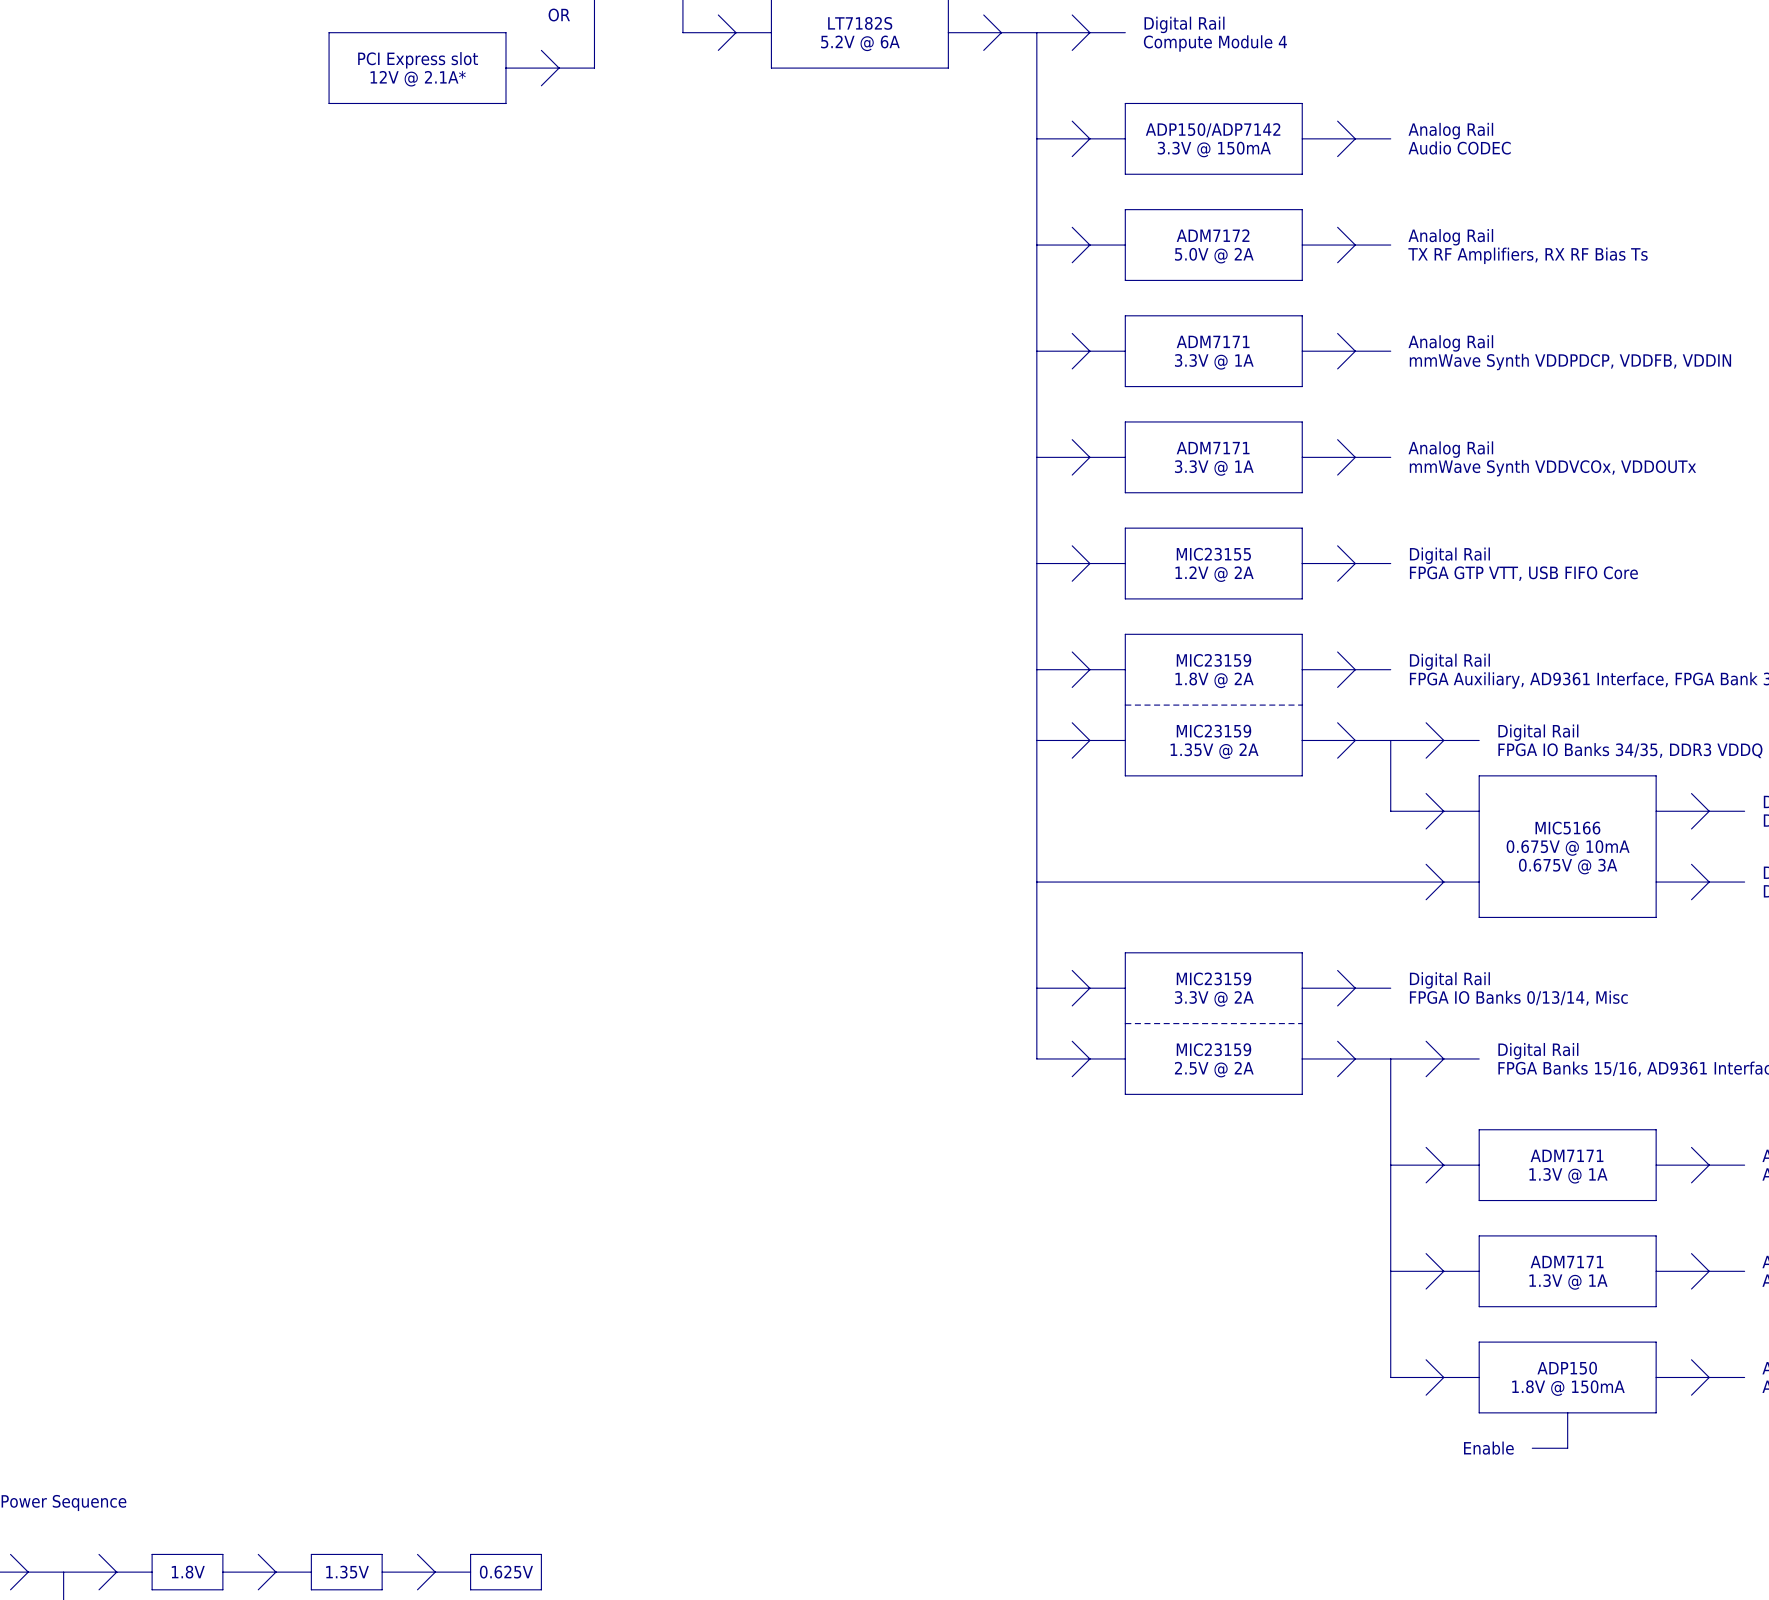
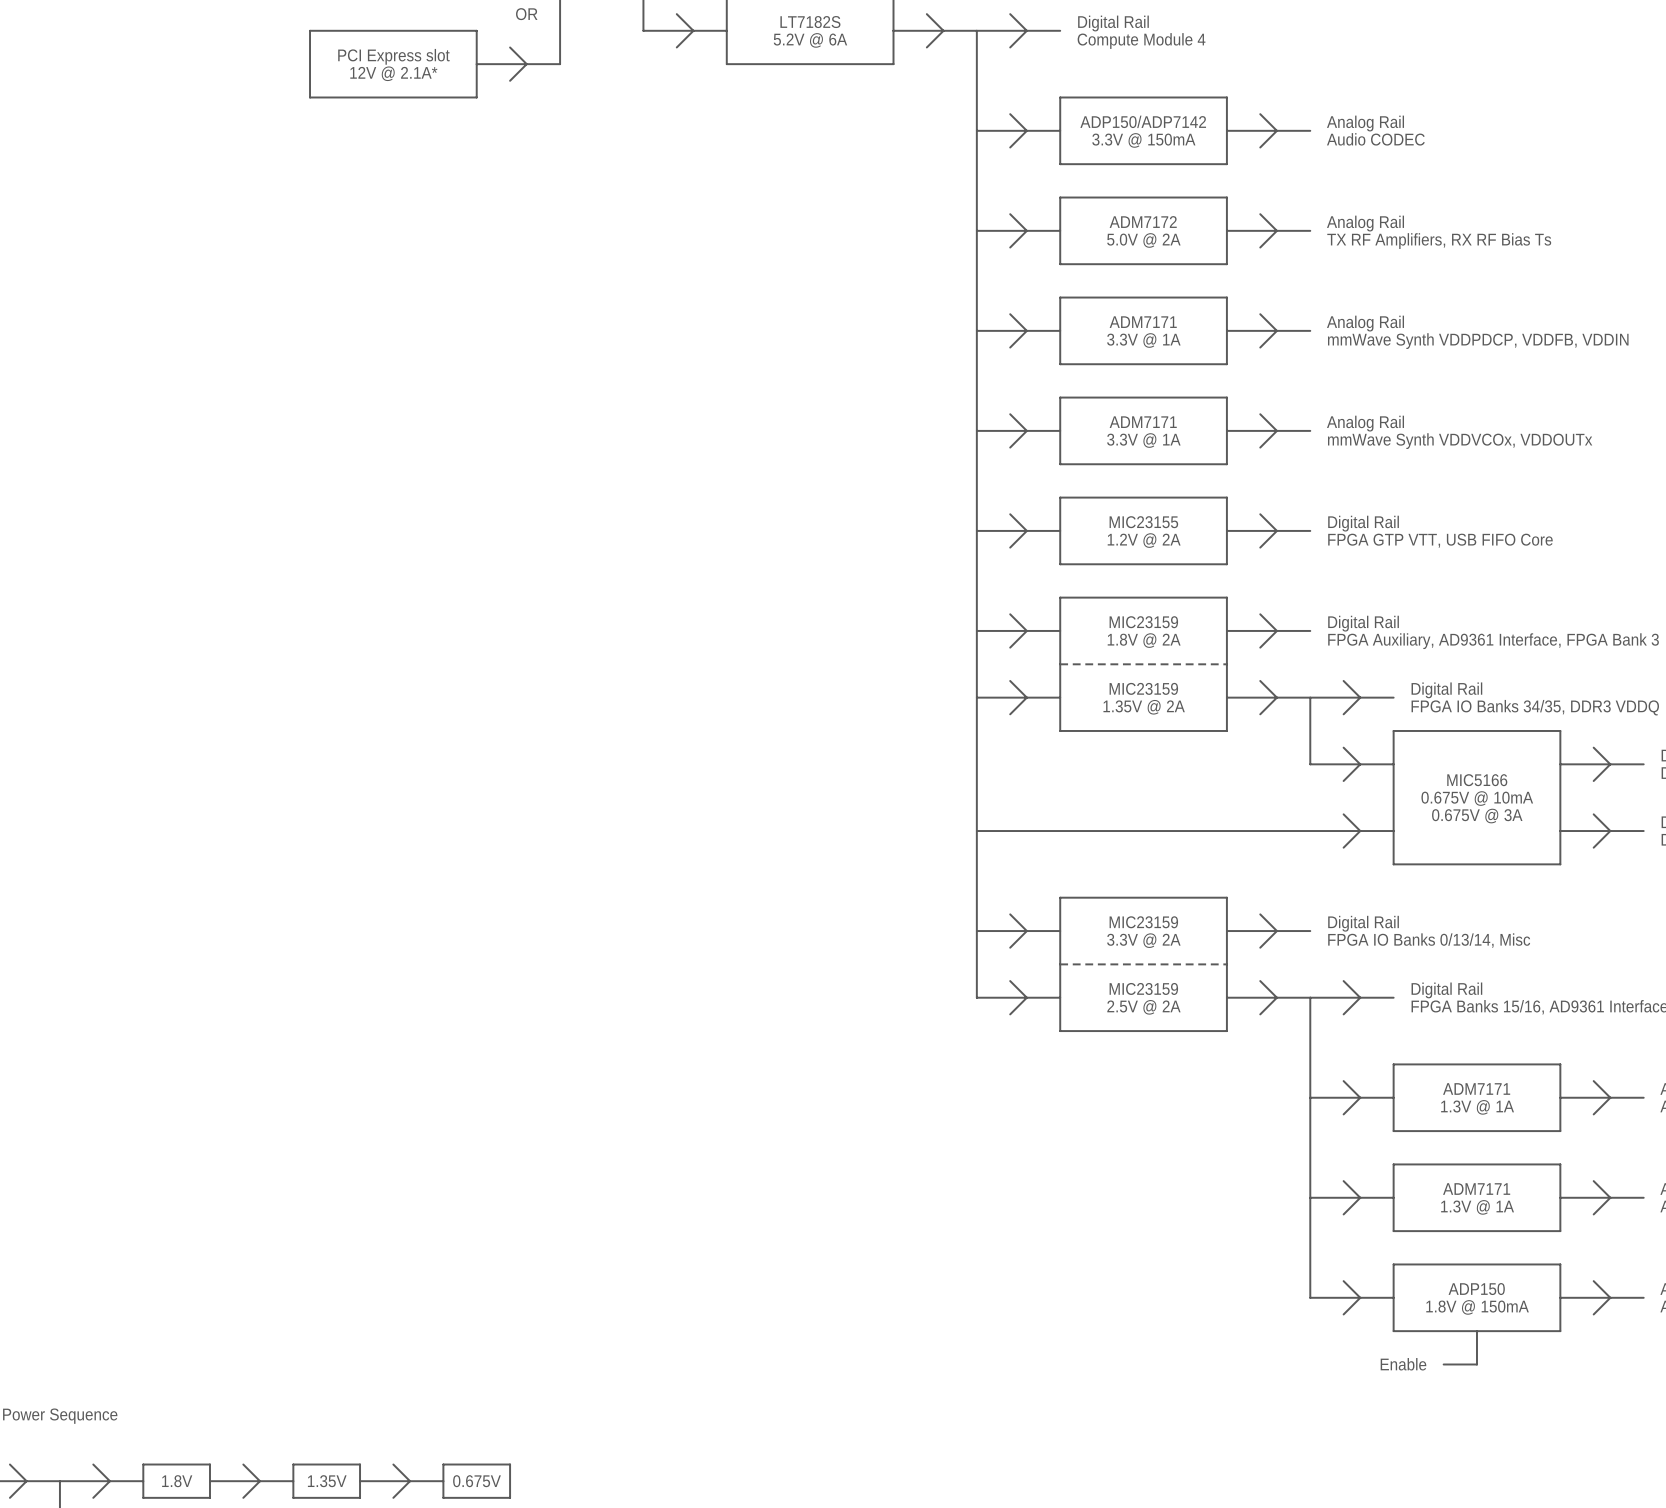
text: 0.625V (506, 1572) -> 0.675V (476, 1481)

